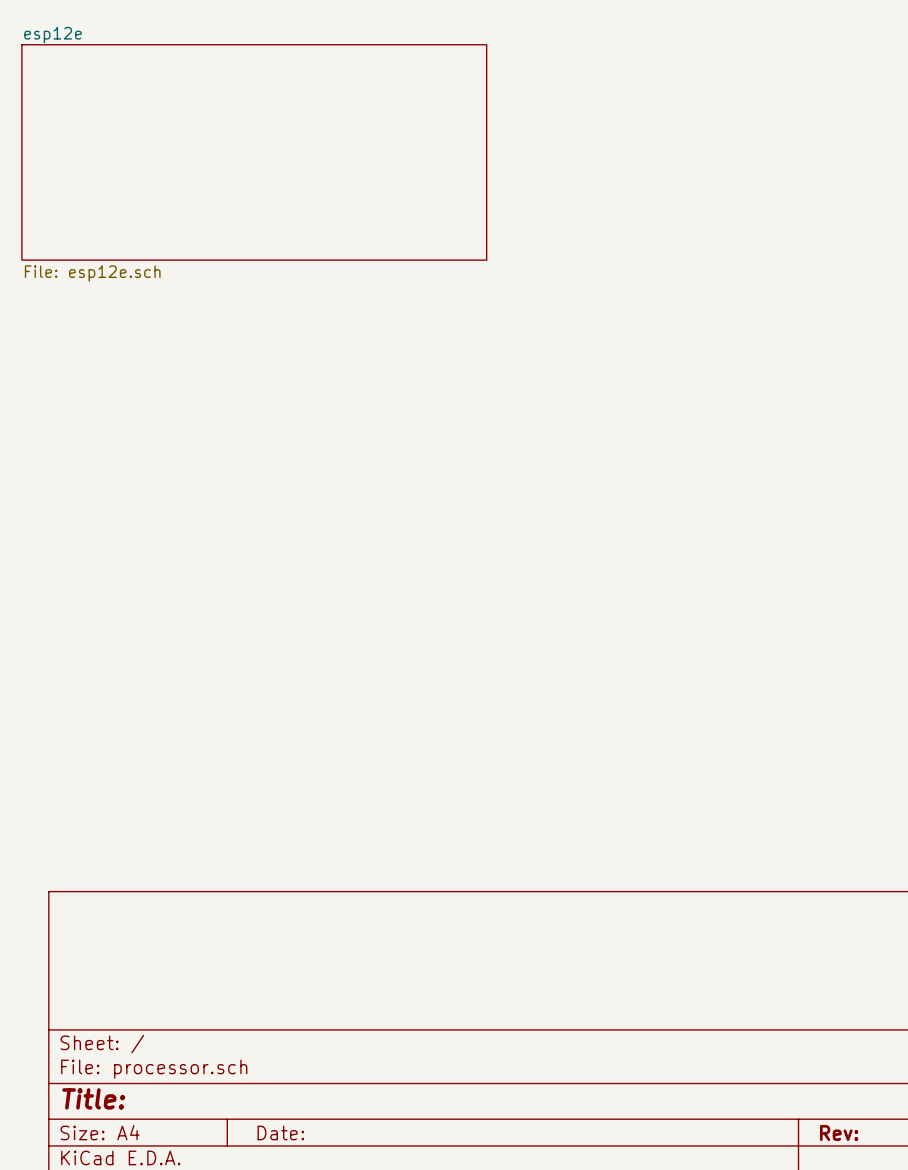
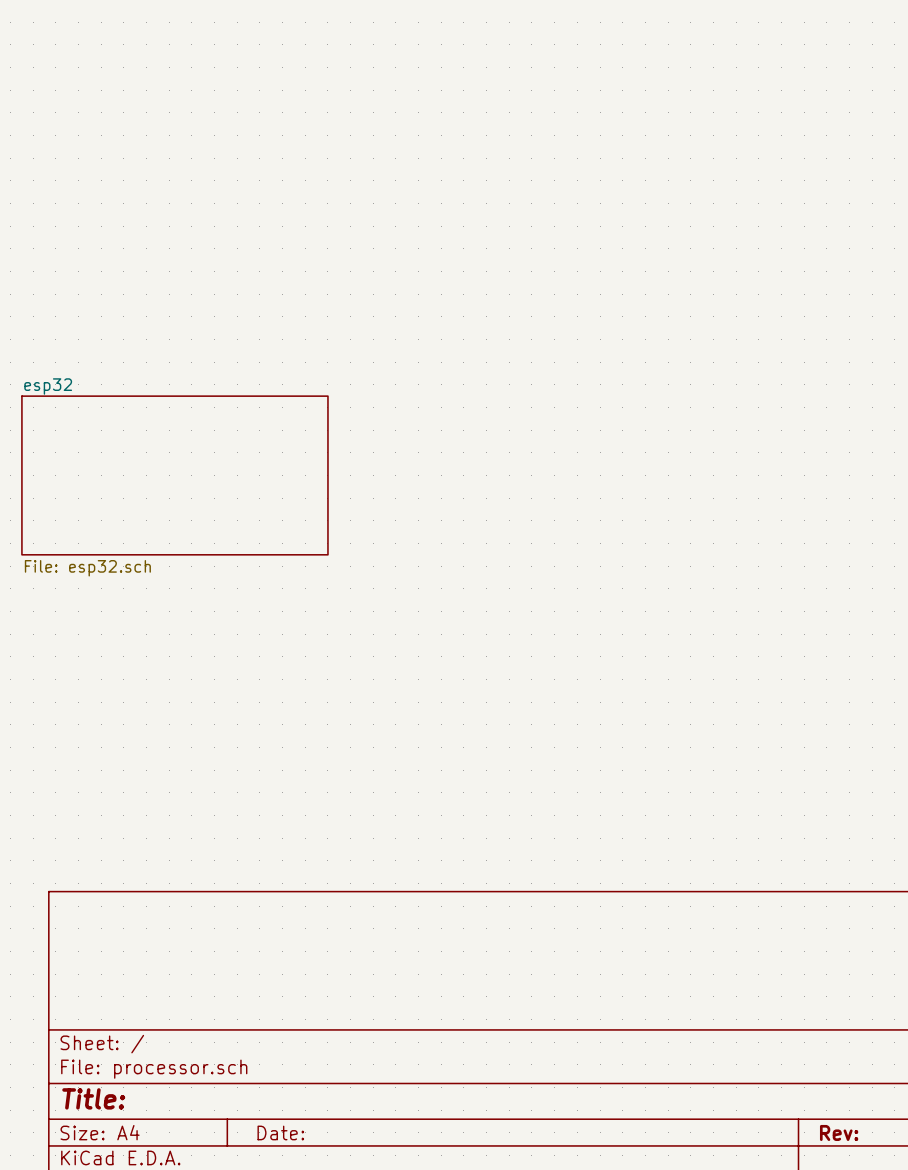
sheet esp12e: File: esp12e.sch (254, 152) -> none
sheet esp32: none -> File: esp32.sch (174, 475)

